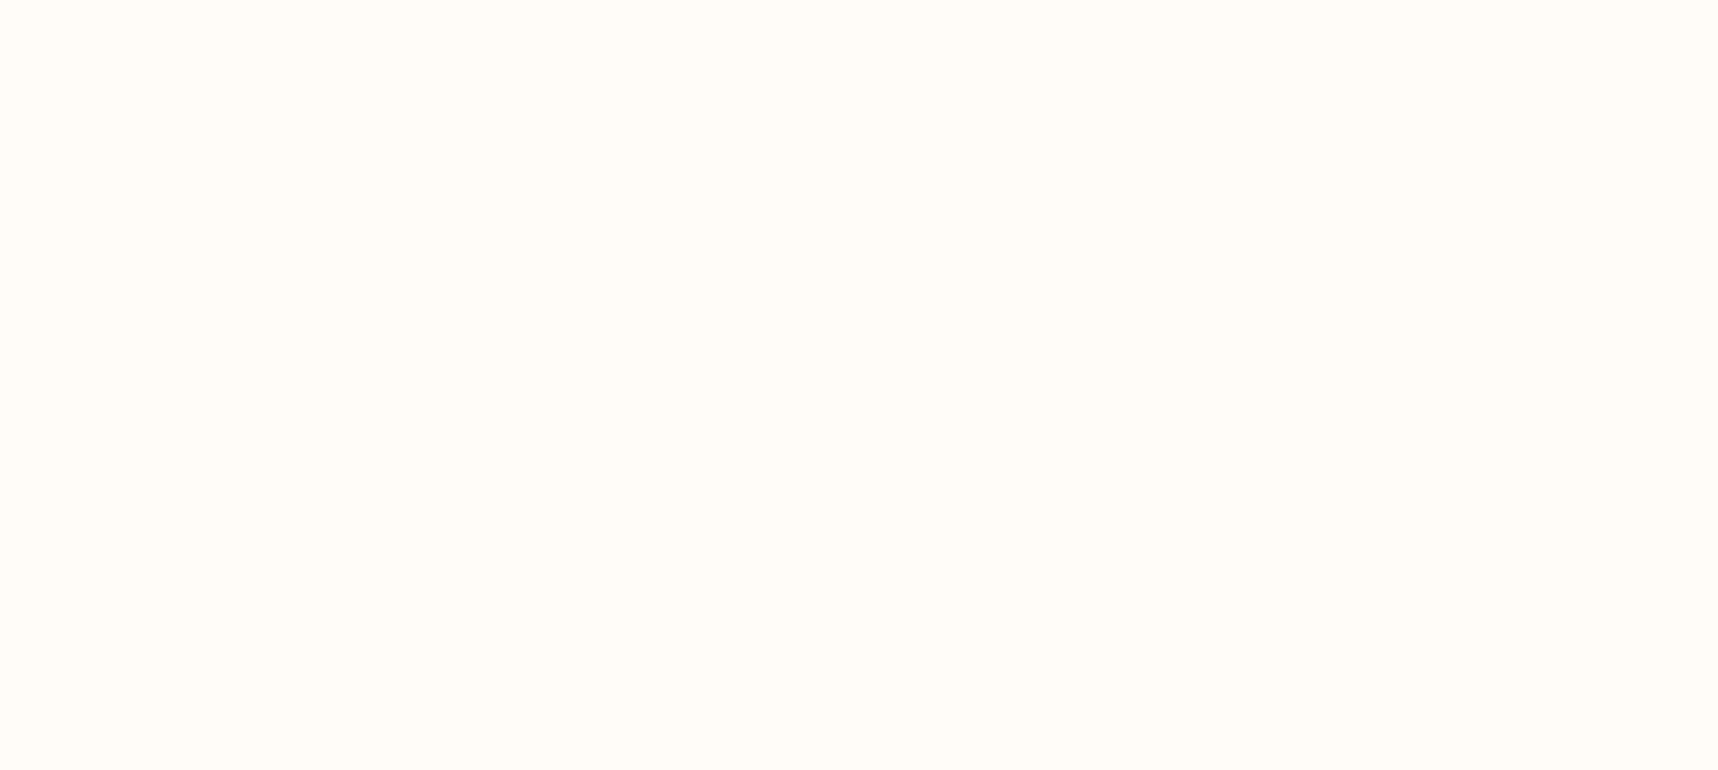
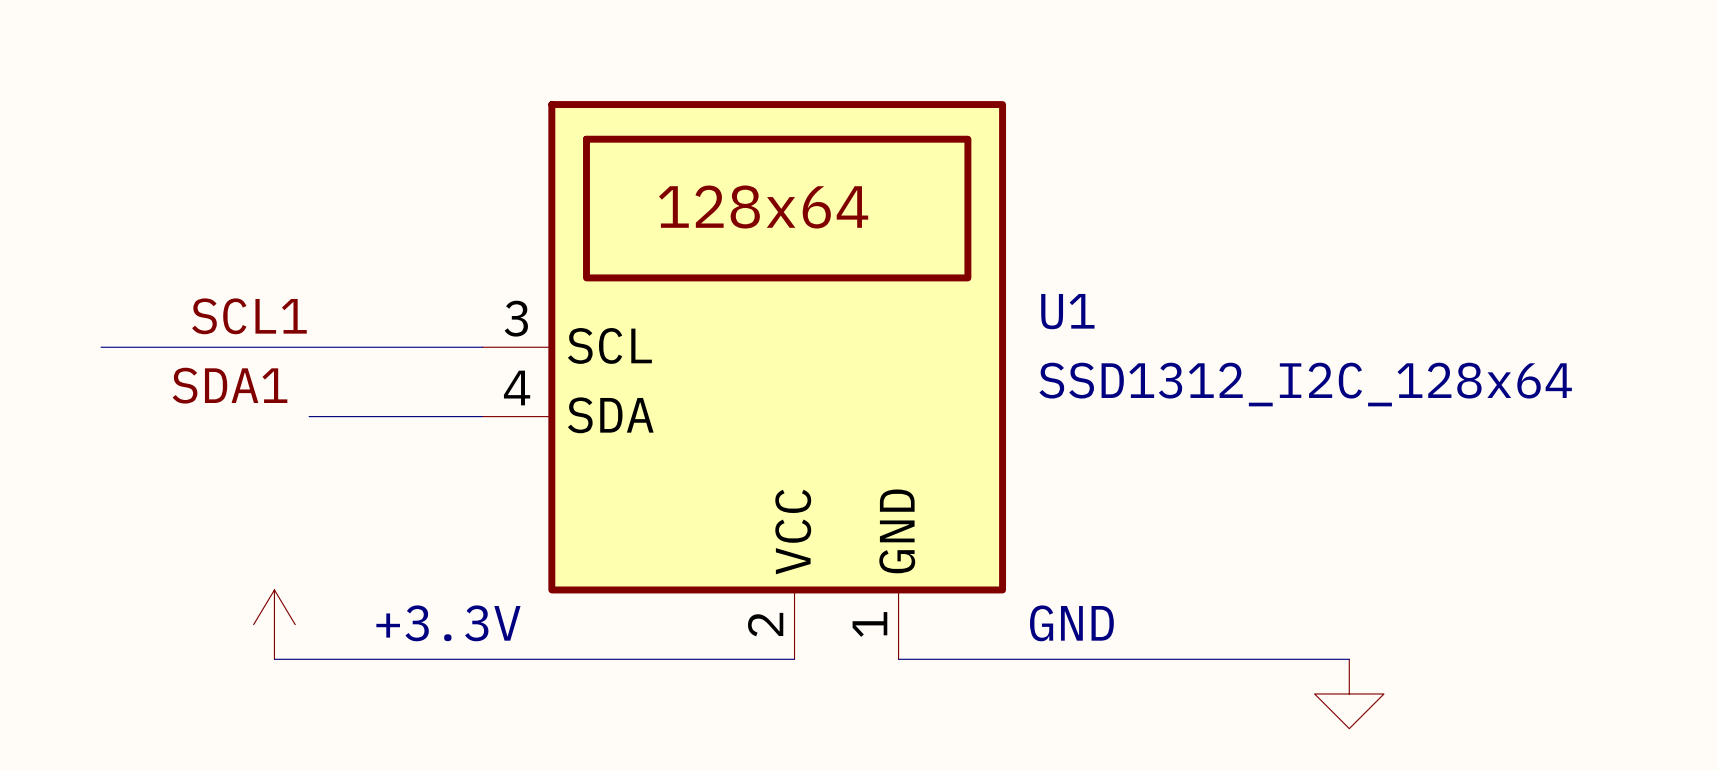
label: none -> SCL1 (249, 316)
wire: none -> (101, 347) (482, 347)
U1: none -> SSD1312_I2C_128x64 (744, 380)
label: none -> SDA1 (229, 385)
wire: none -> (309, 416) (482, 416)
power symbol: none -> +3.3V (274, 624)
wire: none -> (274, 659) (794, 659)
wire: none -> (898, 659) (1349, 659)
power symbol: none -> GND (1349, 693)

